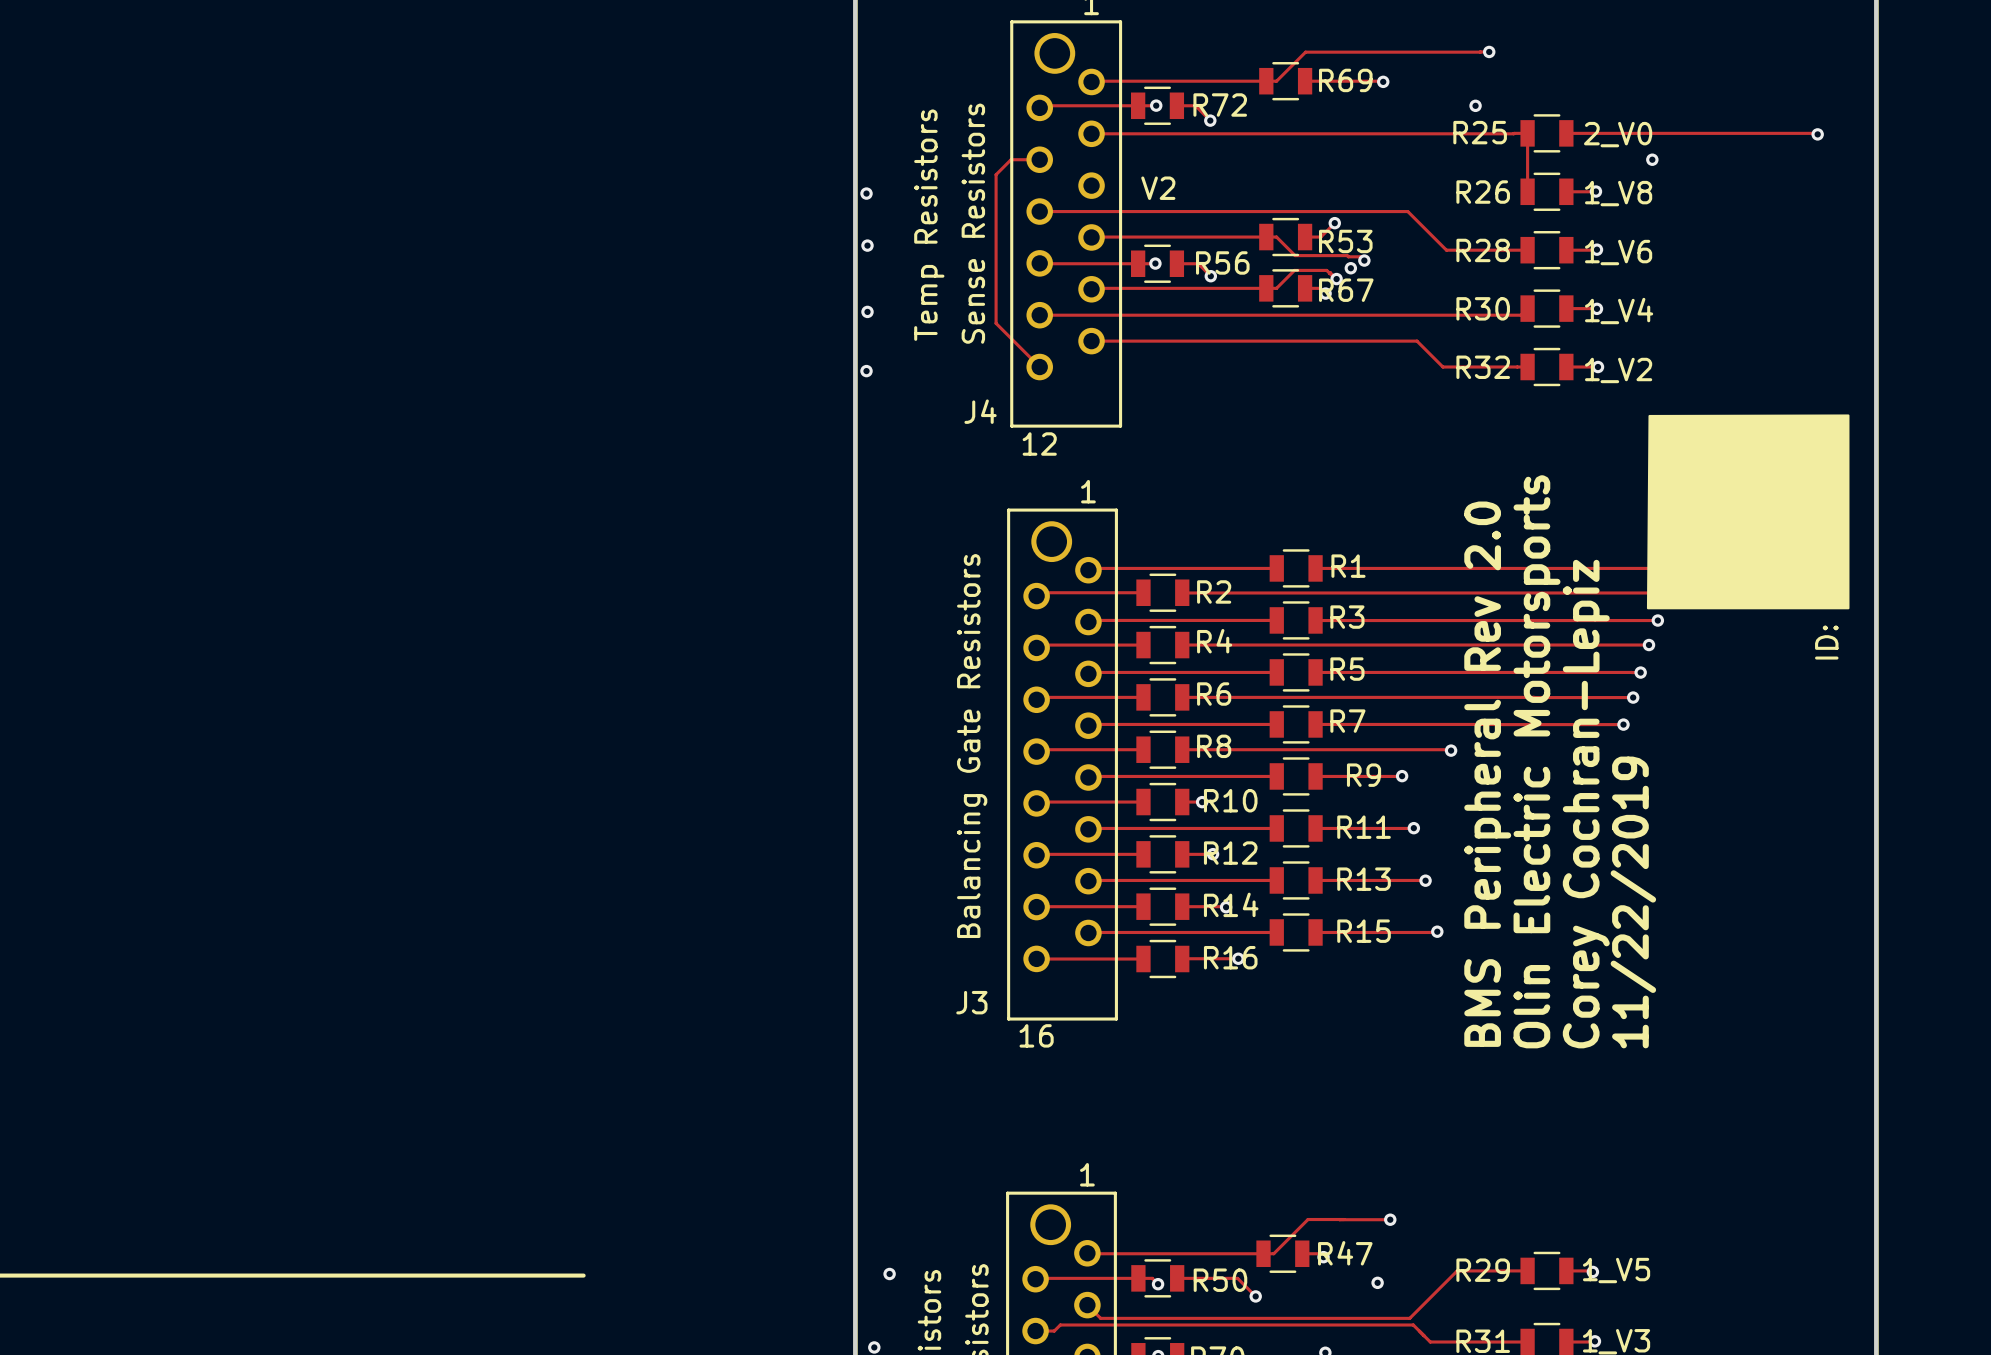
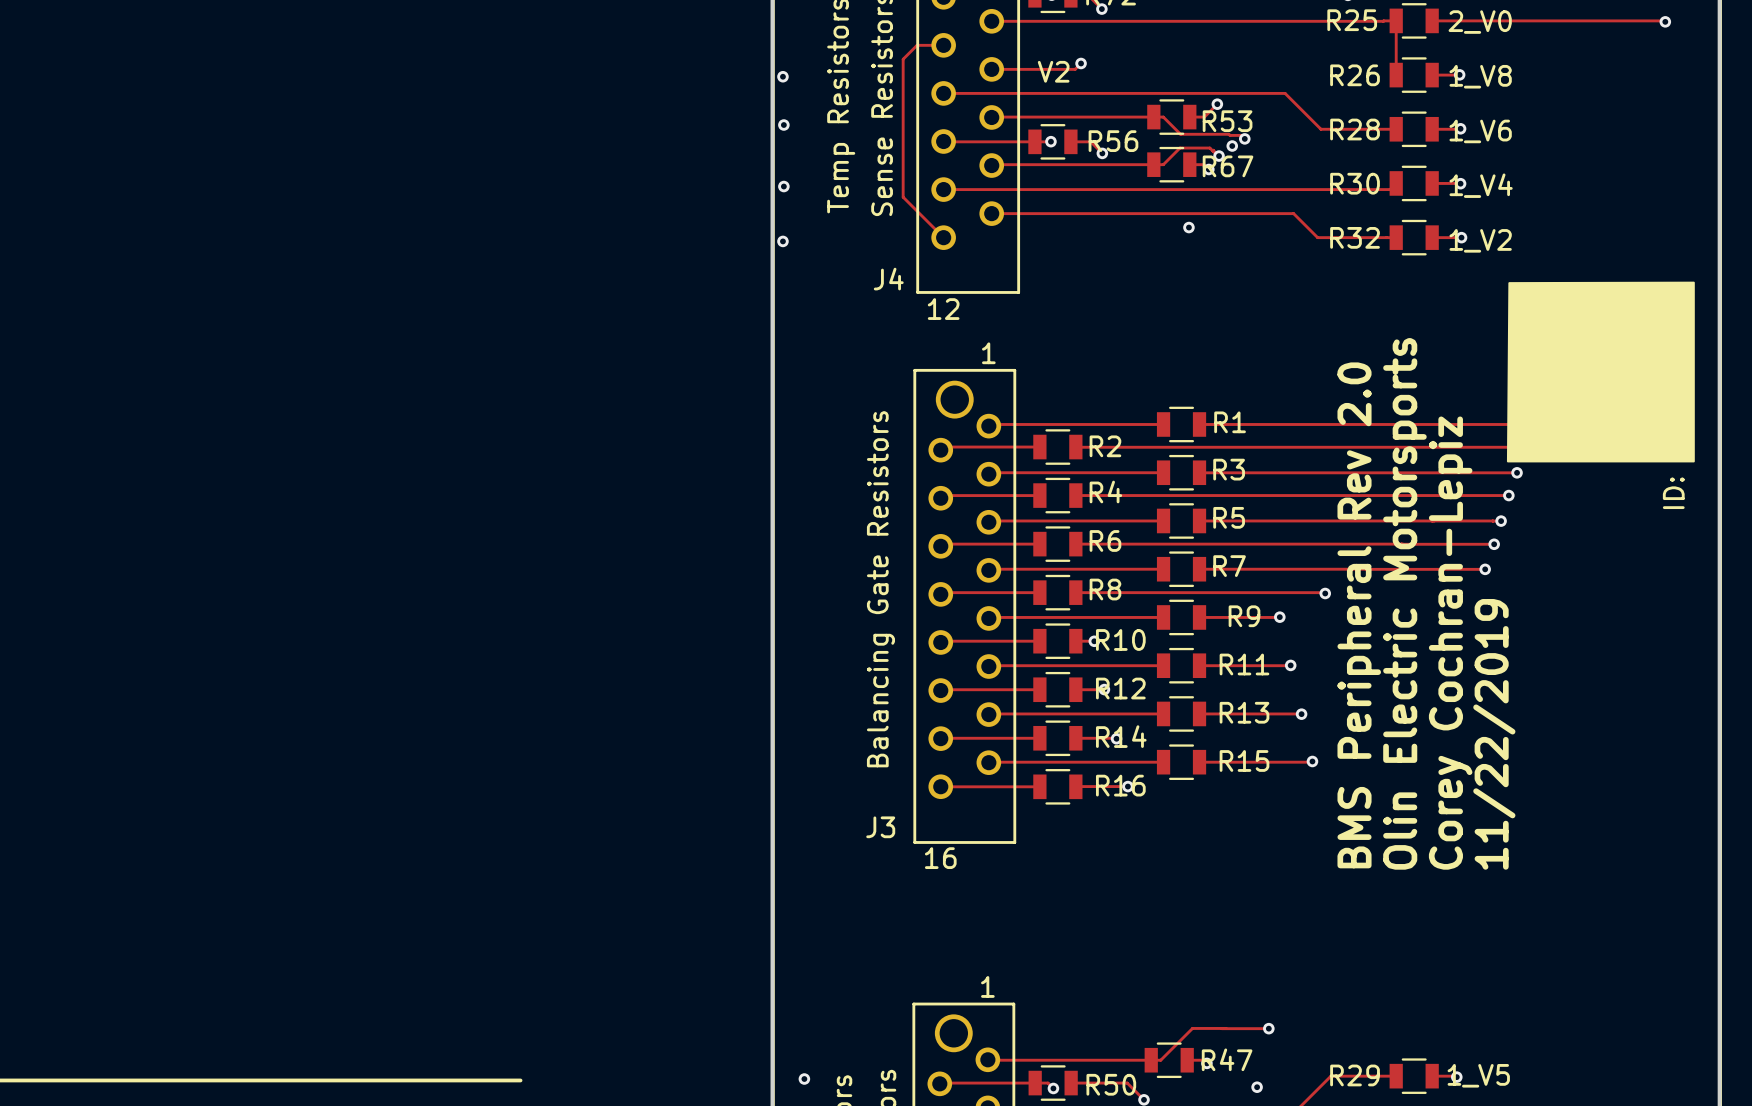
via: (1652, 159) -> none
track: none -> (1081, 63) (1075, 69) (991, 69)
via: none -> (1081, 63)
via: none -> (1188, 227)

